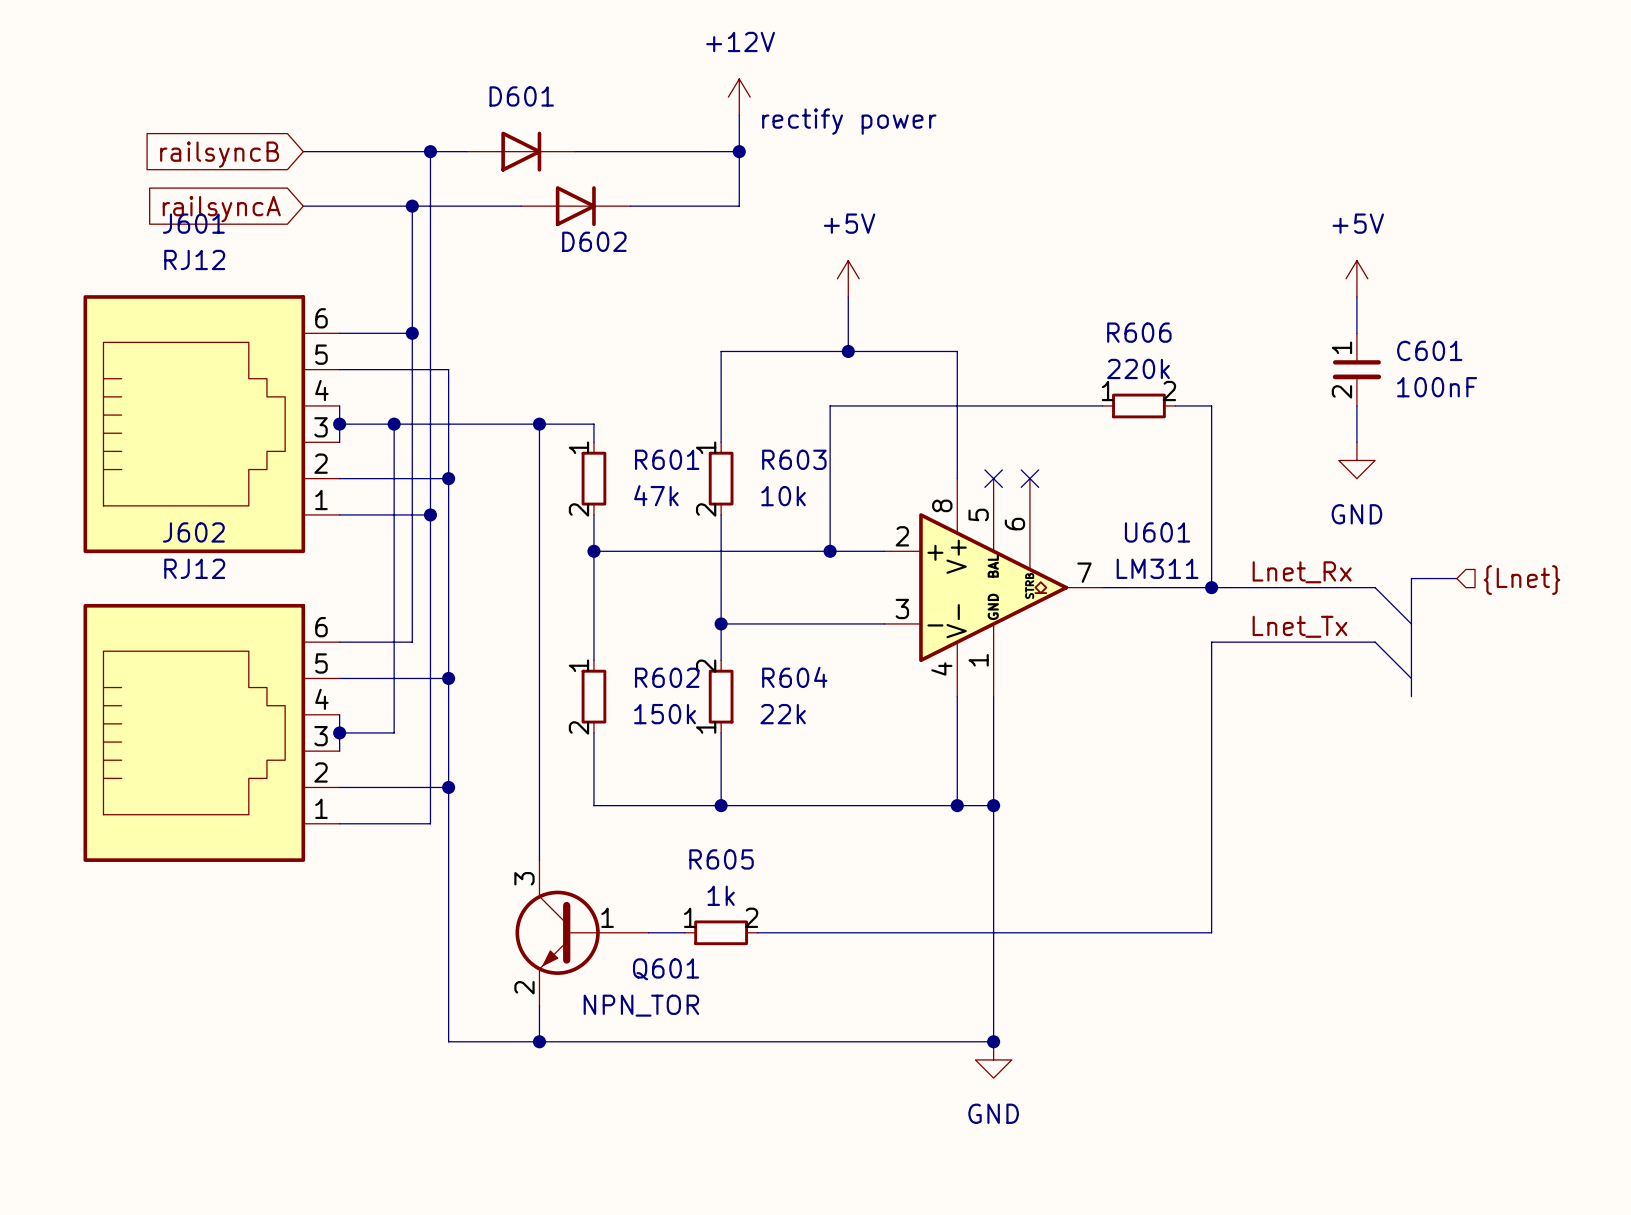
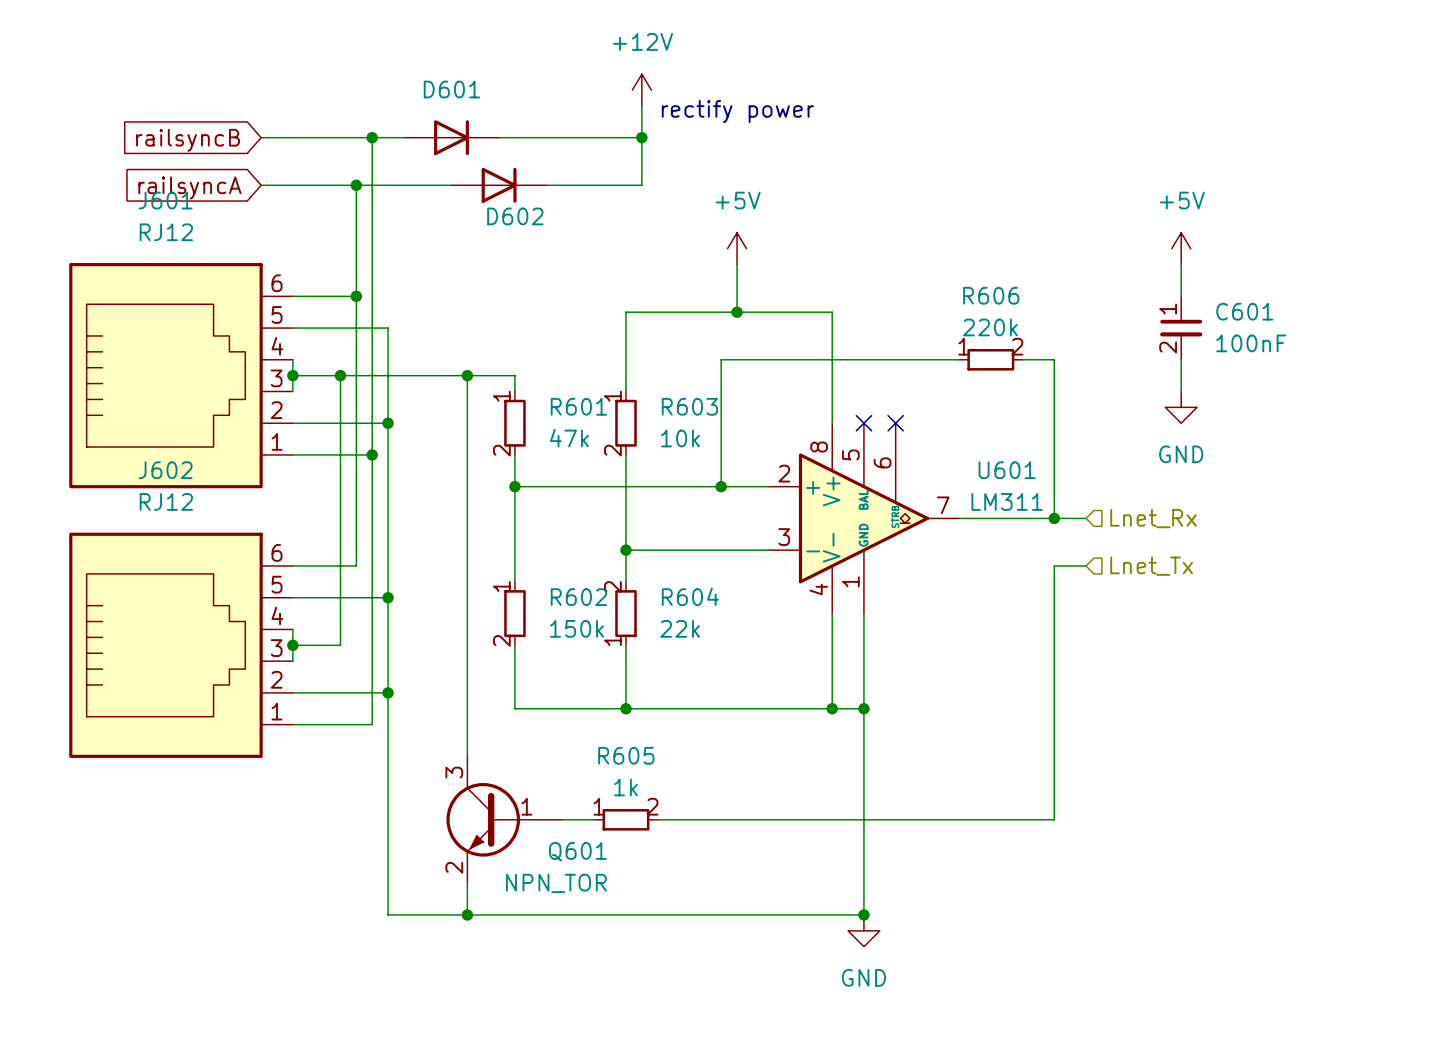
label: Lnet_Rx (1302, 572) -> none
bus: (1456, 578) (1411, 578) (1411, 696) -> none
hierarchical label: {Lnet} (1522, 580) -> none
wire: (1247, 587) (1375, 587) (1411, 623) -> none
hierarchical label: none -> Lnet_Rx (1153, 518)
label: Lnet_Tx (1299, 626) -> none
wire: (1247, 642) (1375, 642) (1411, 678) -> none
hierarchical label: none -> Lnet_Tx (1151, 566)

